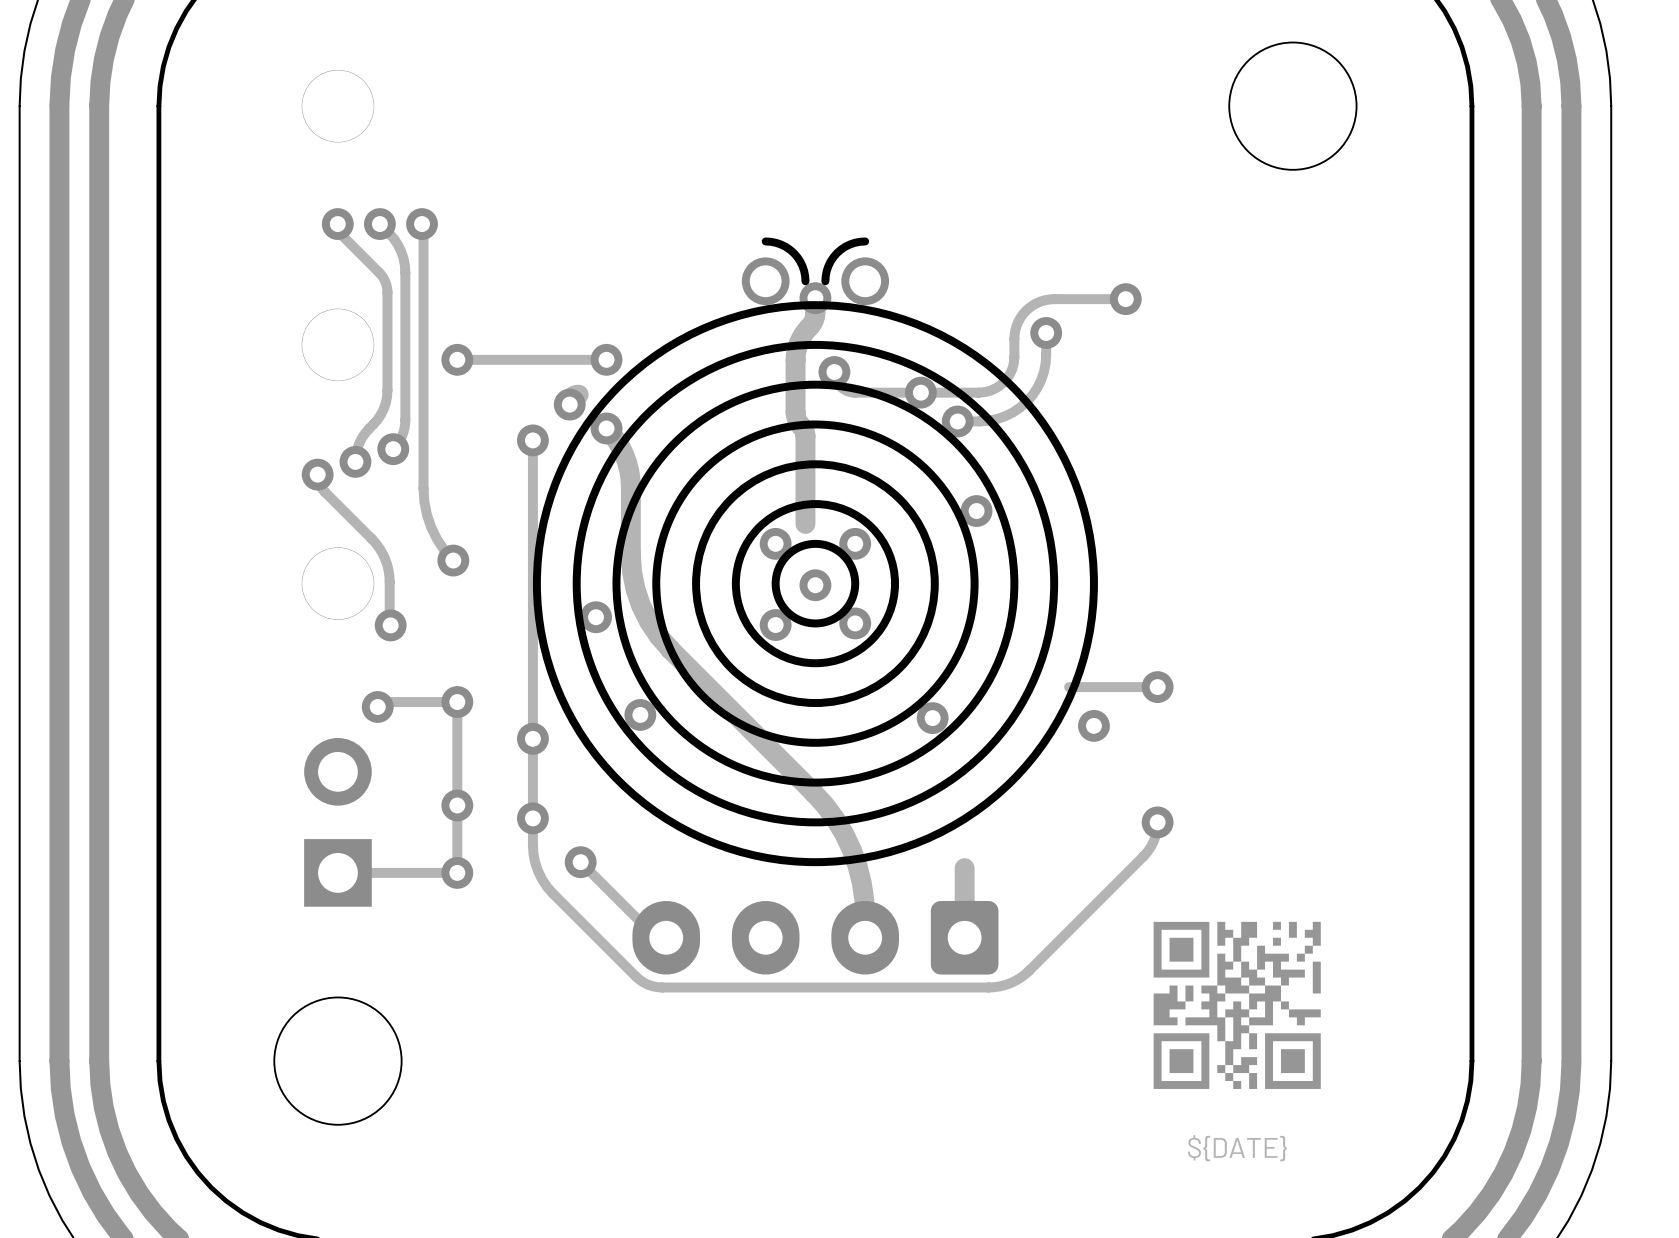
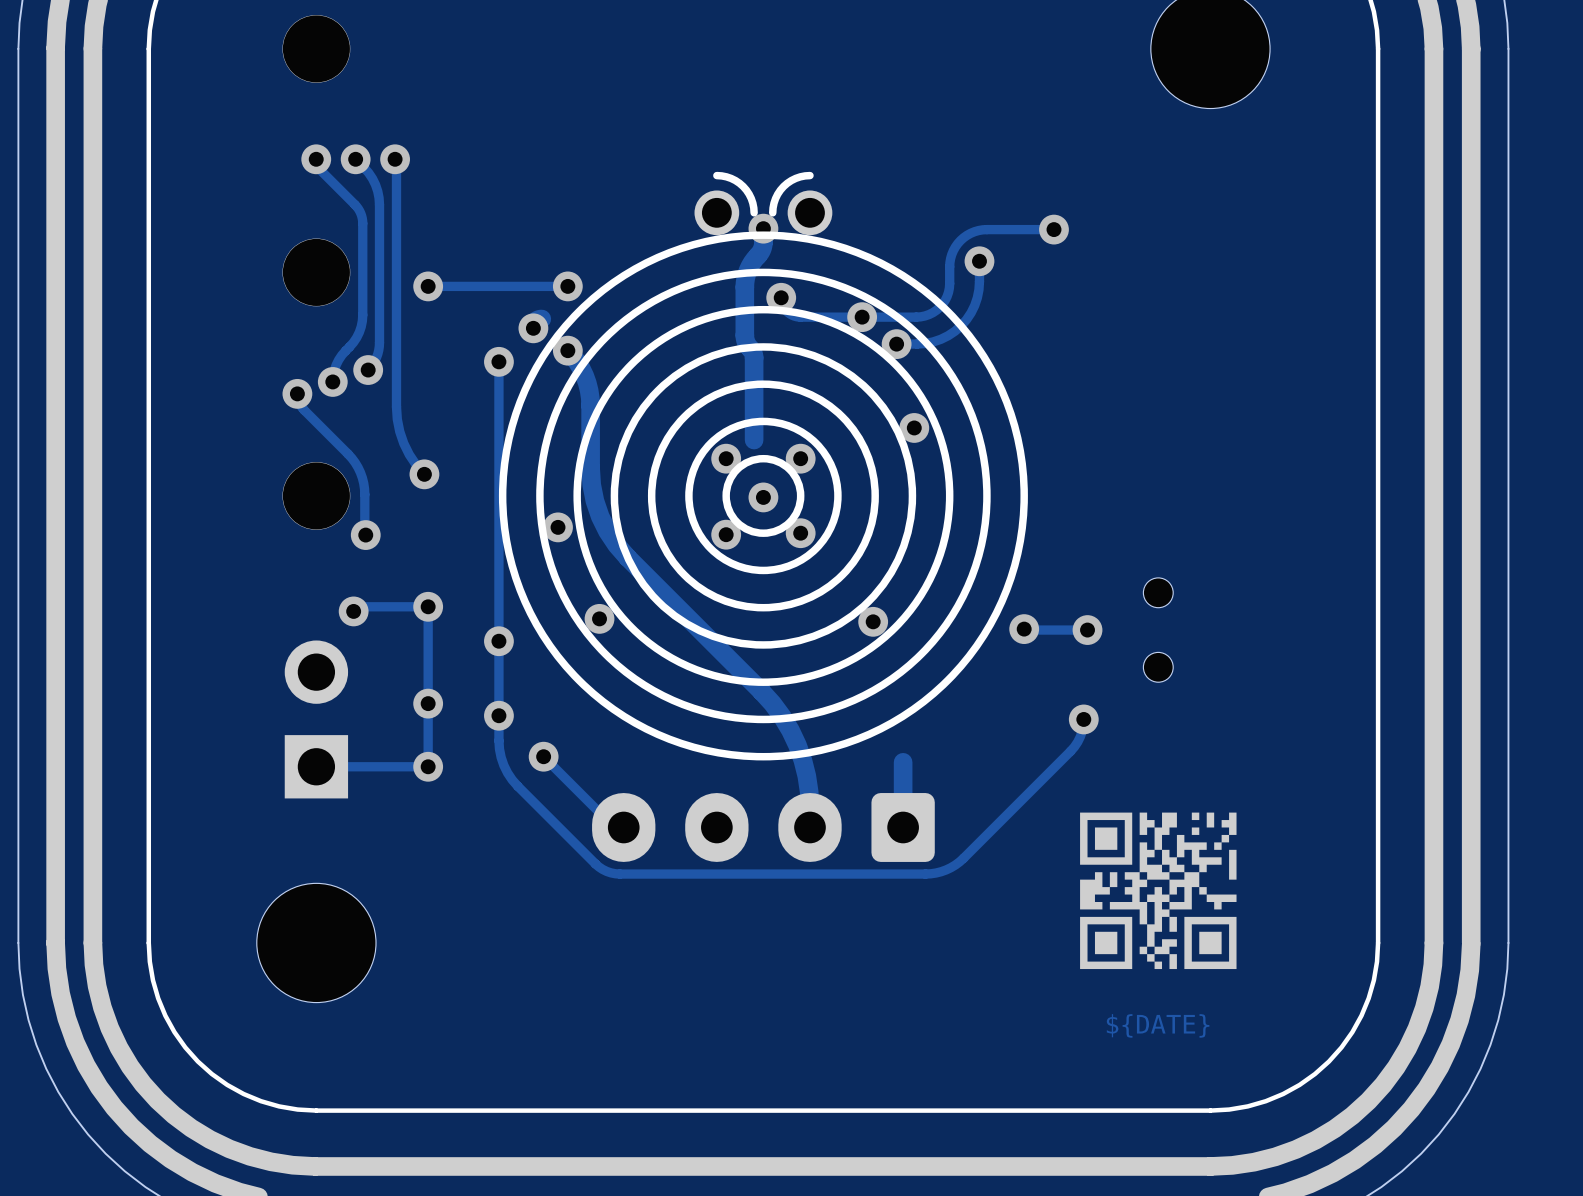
track: (1157, 687) (1069, 687) -> none
via position: (1157, 687) -> (1087, 630)
track: none -> (1024, 629) (1087, 630)
part: none -> (1158, 630)

